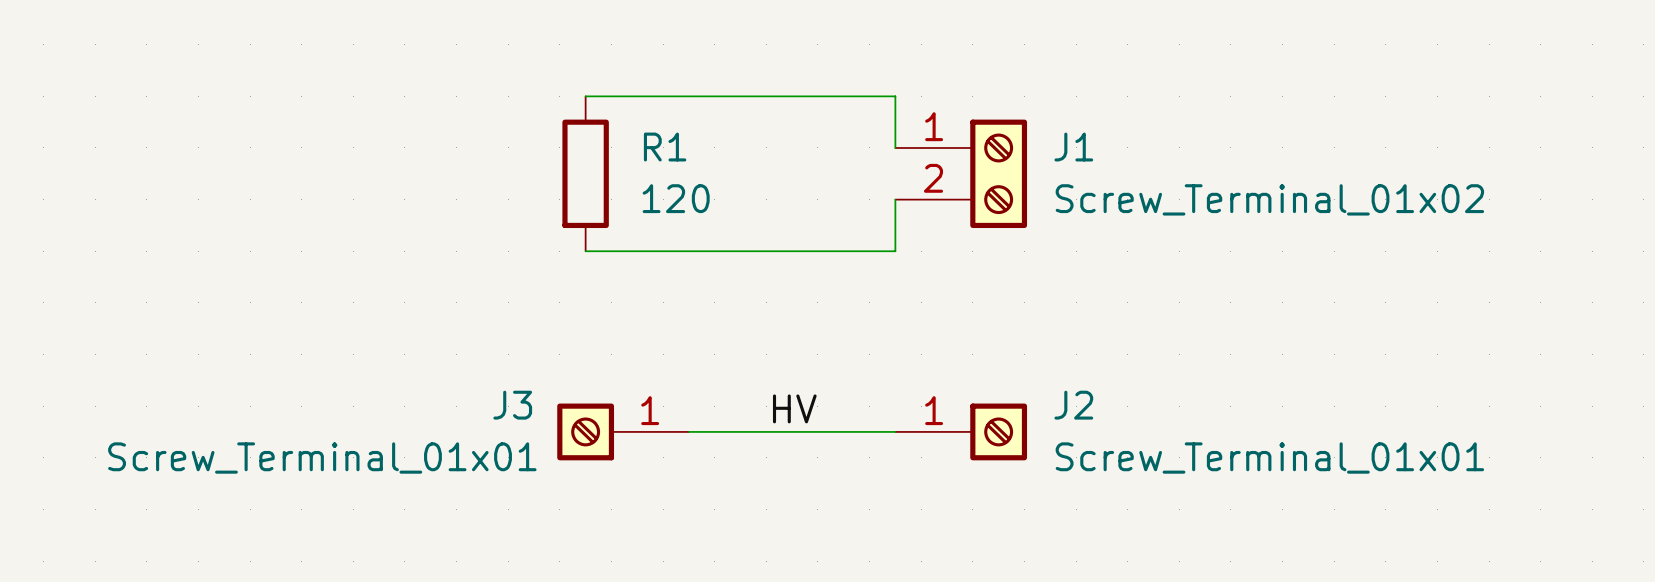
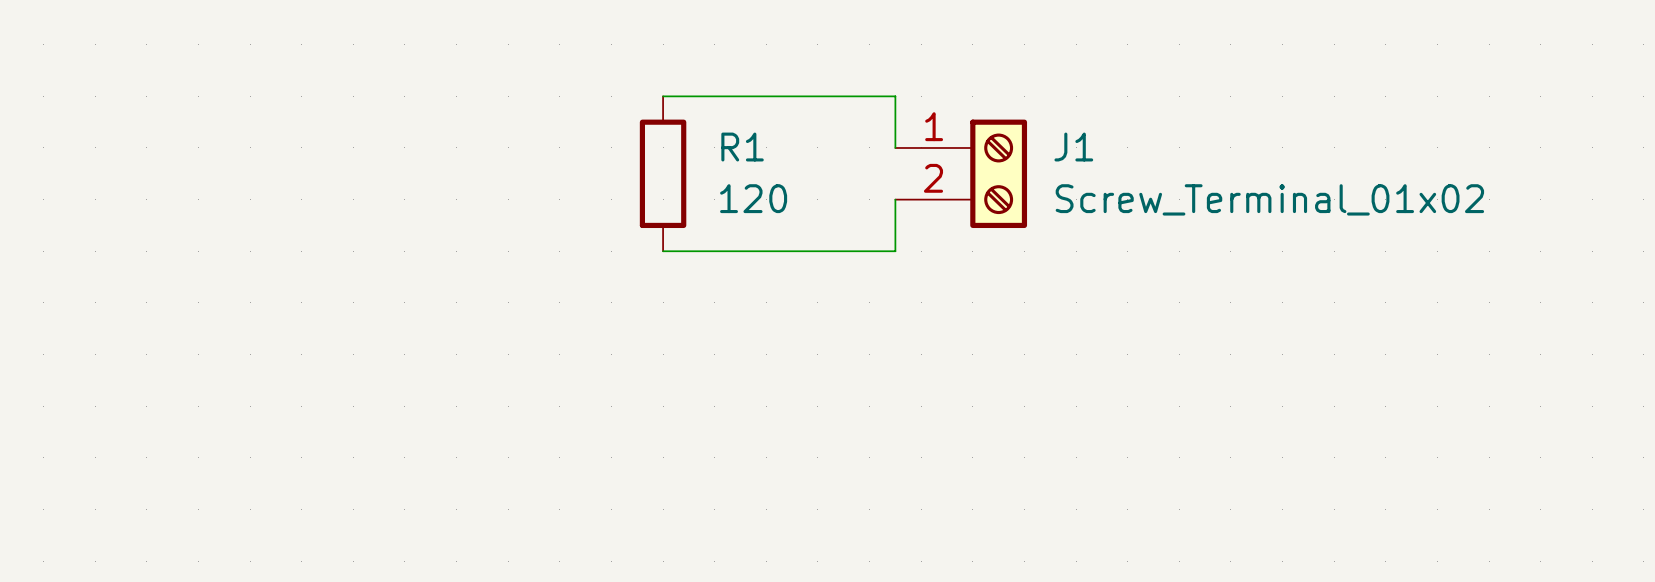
wire: (585, 96) (663, 96) -> none
R1 position: (585, 173) -> (663, 173)
wire: (585, 251) (663, 251) -> none
label: HV (794, 408) -> none
J3: Screw_Terminal_01x01 (623, 431) -> none
wire: (688, 431) (895, 431) -> none
J2: Screw_Terminal_01x01 (961, 431) -> none

